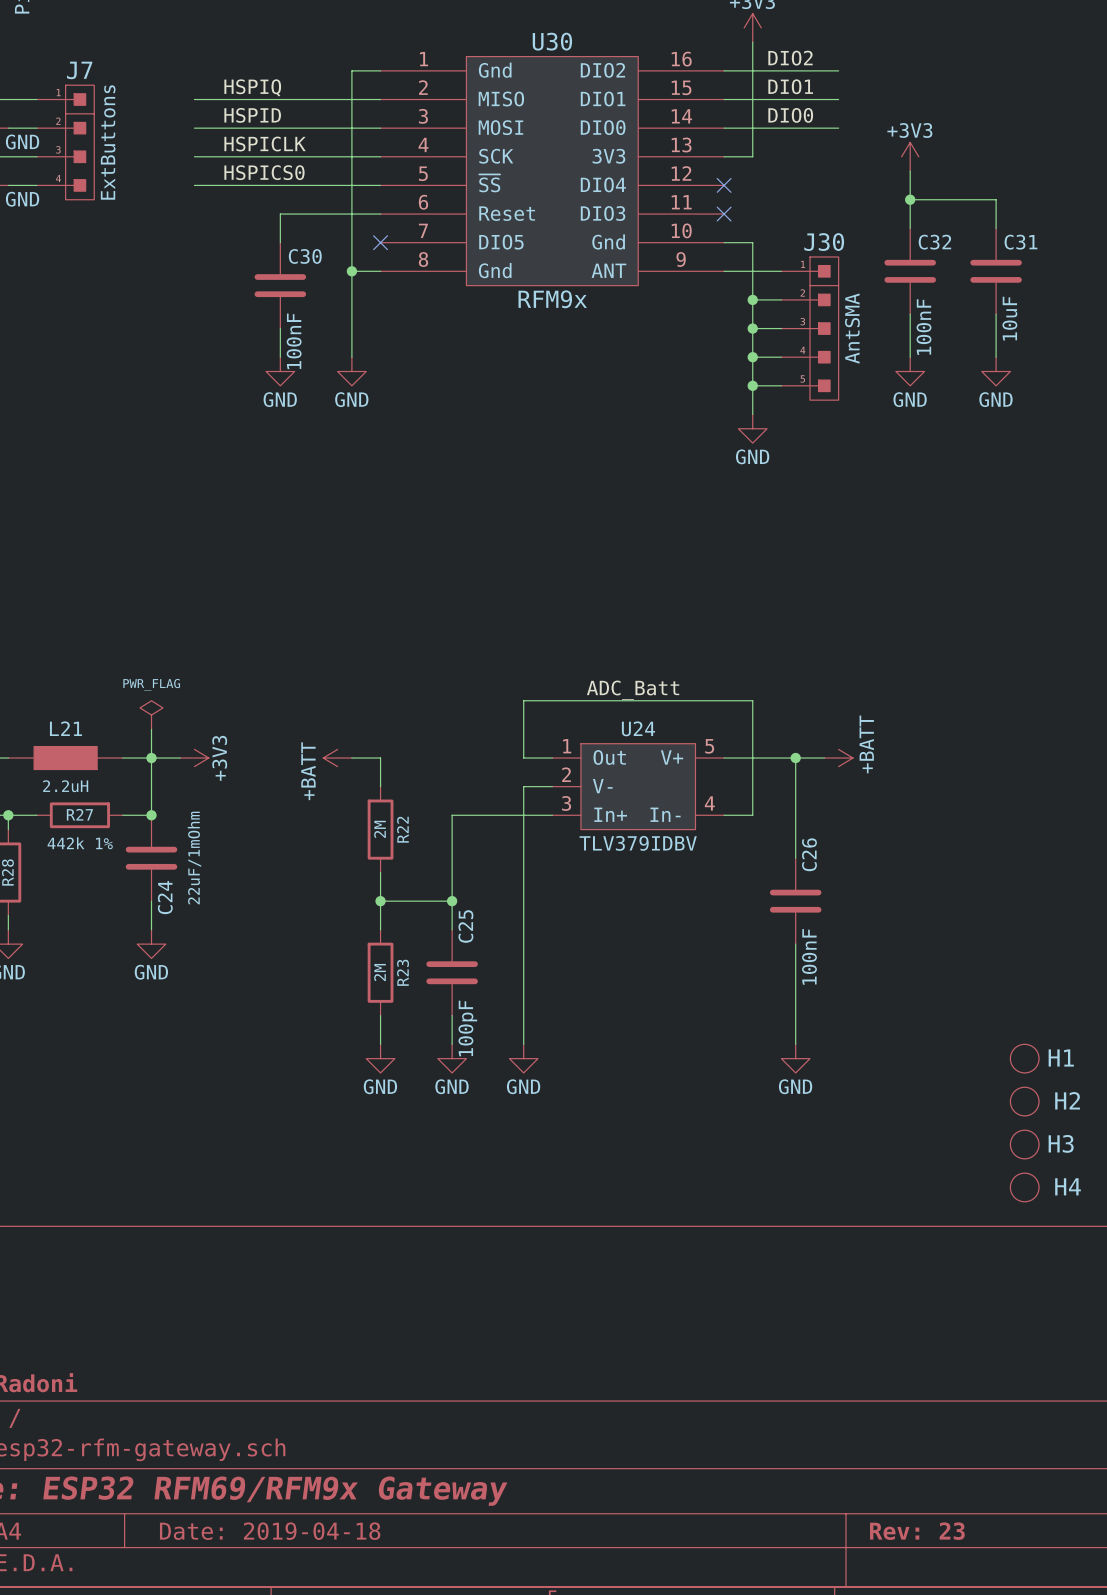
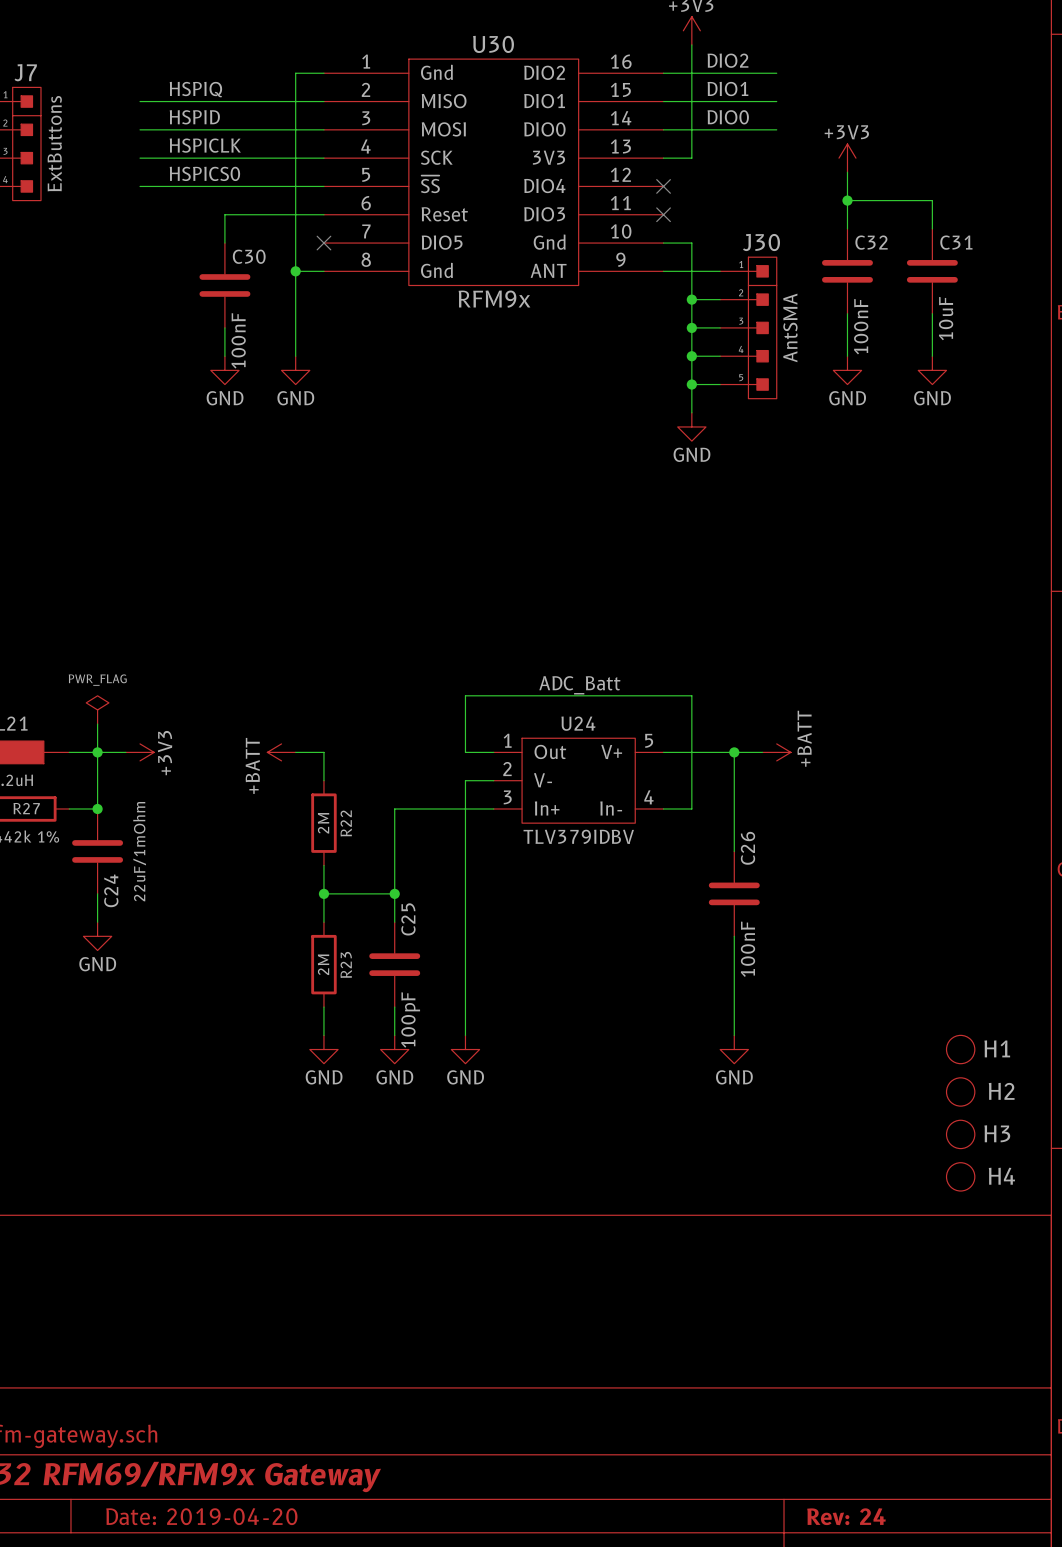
title block: Date: 2019-04-18 (270, 1531) -> Date: 2019-04-20 (201, 1516)
title block: Rev: 23 (917, 1531) -> Rev: 24 (846, 1516)

